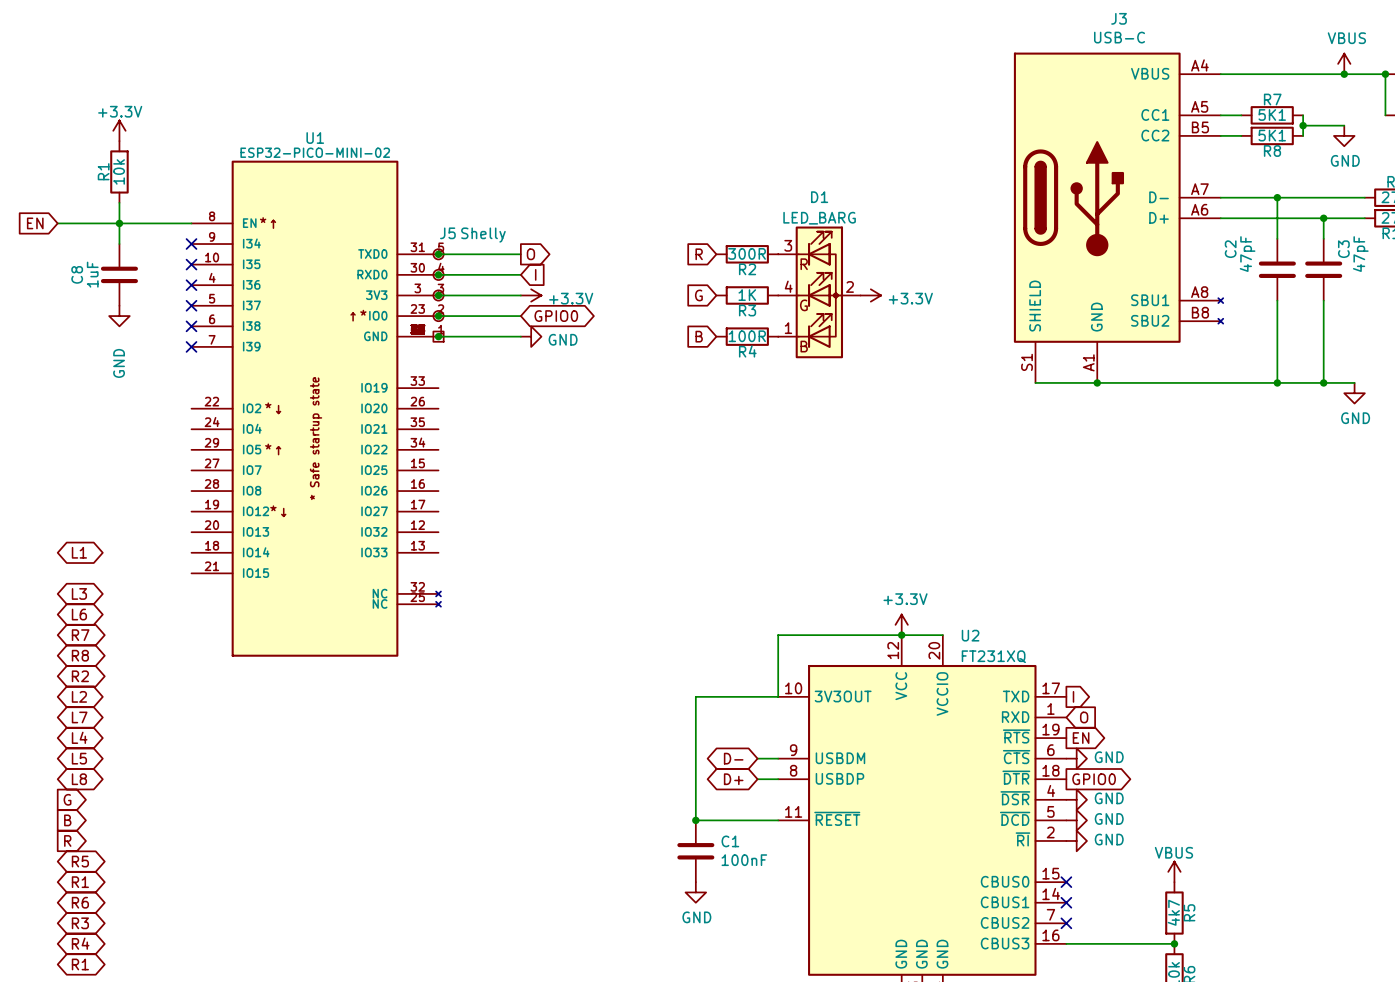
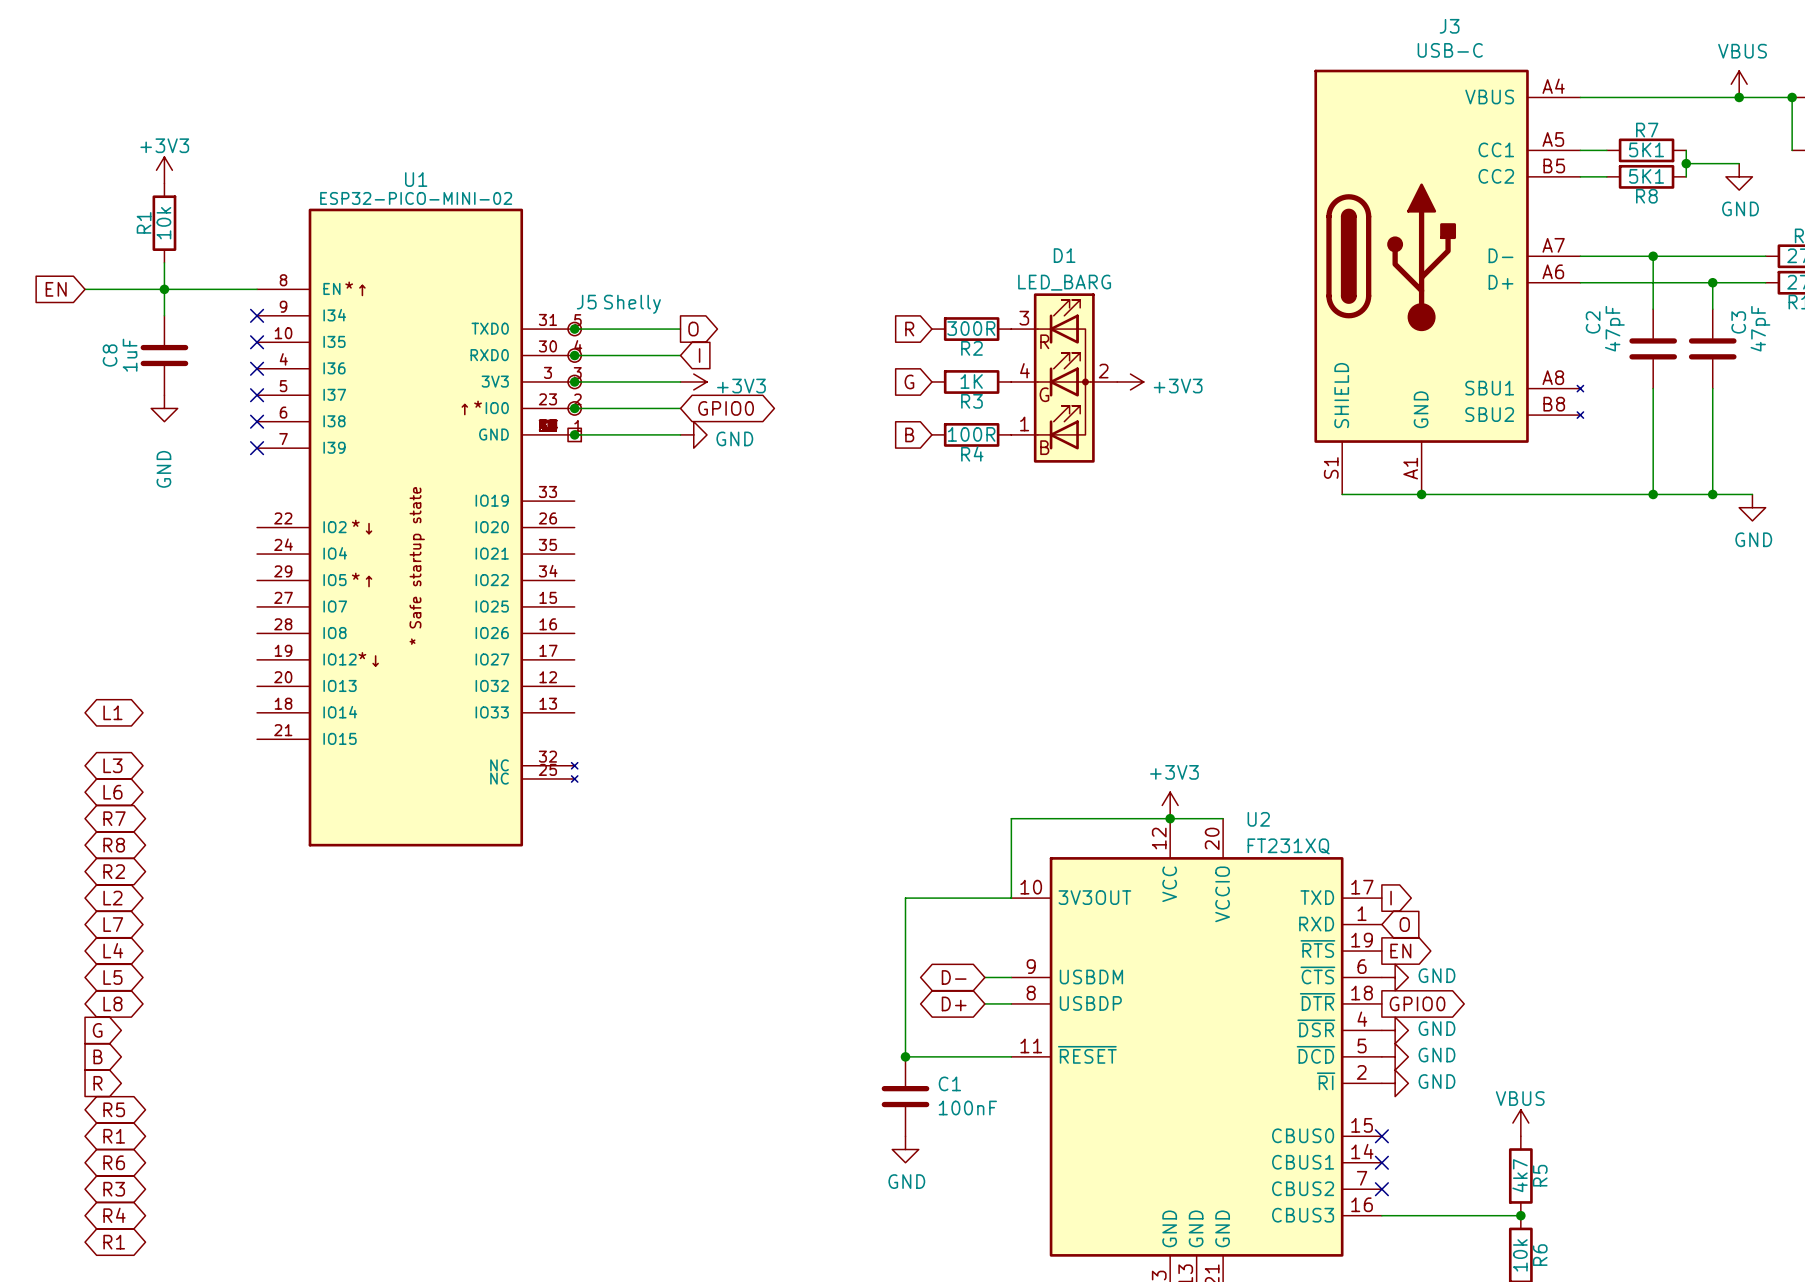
power symbol: +3.3V (119, 130) -> +3V3 (164, 170)
power symbol: +3.3V (531, 295) -> +3V3 (693, 381)
power symbol: +3.3V (870, 295) -> +3V3 (1130, 381)
power symbol: +3.3V (901, 624) -> +3V3 (1170, 805)

